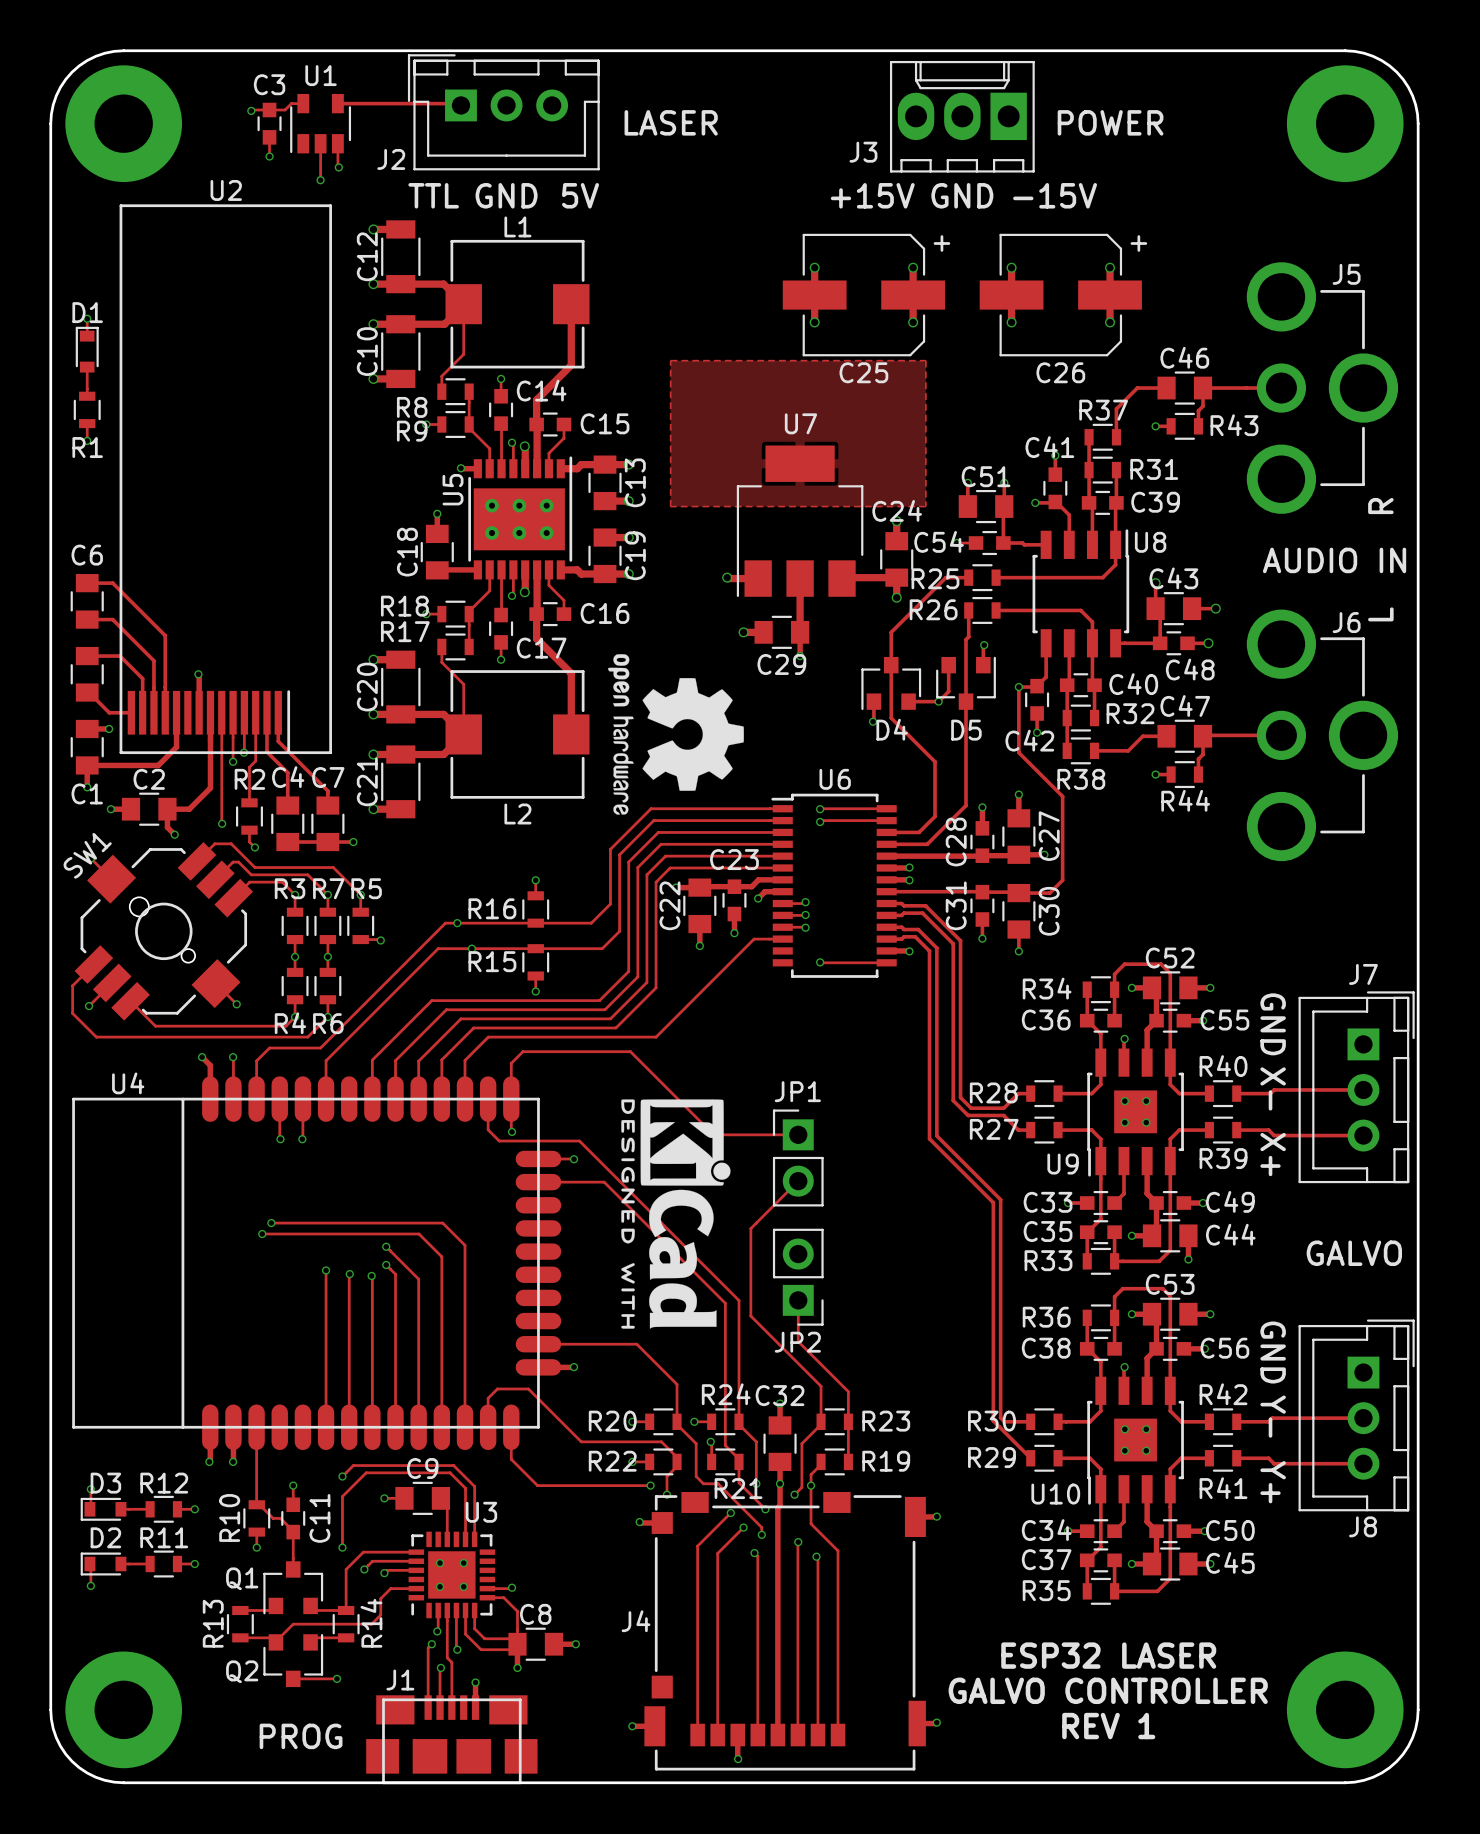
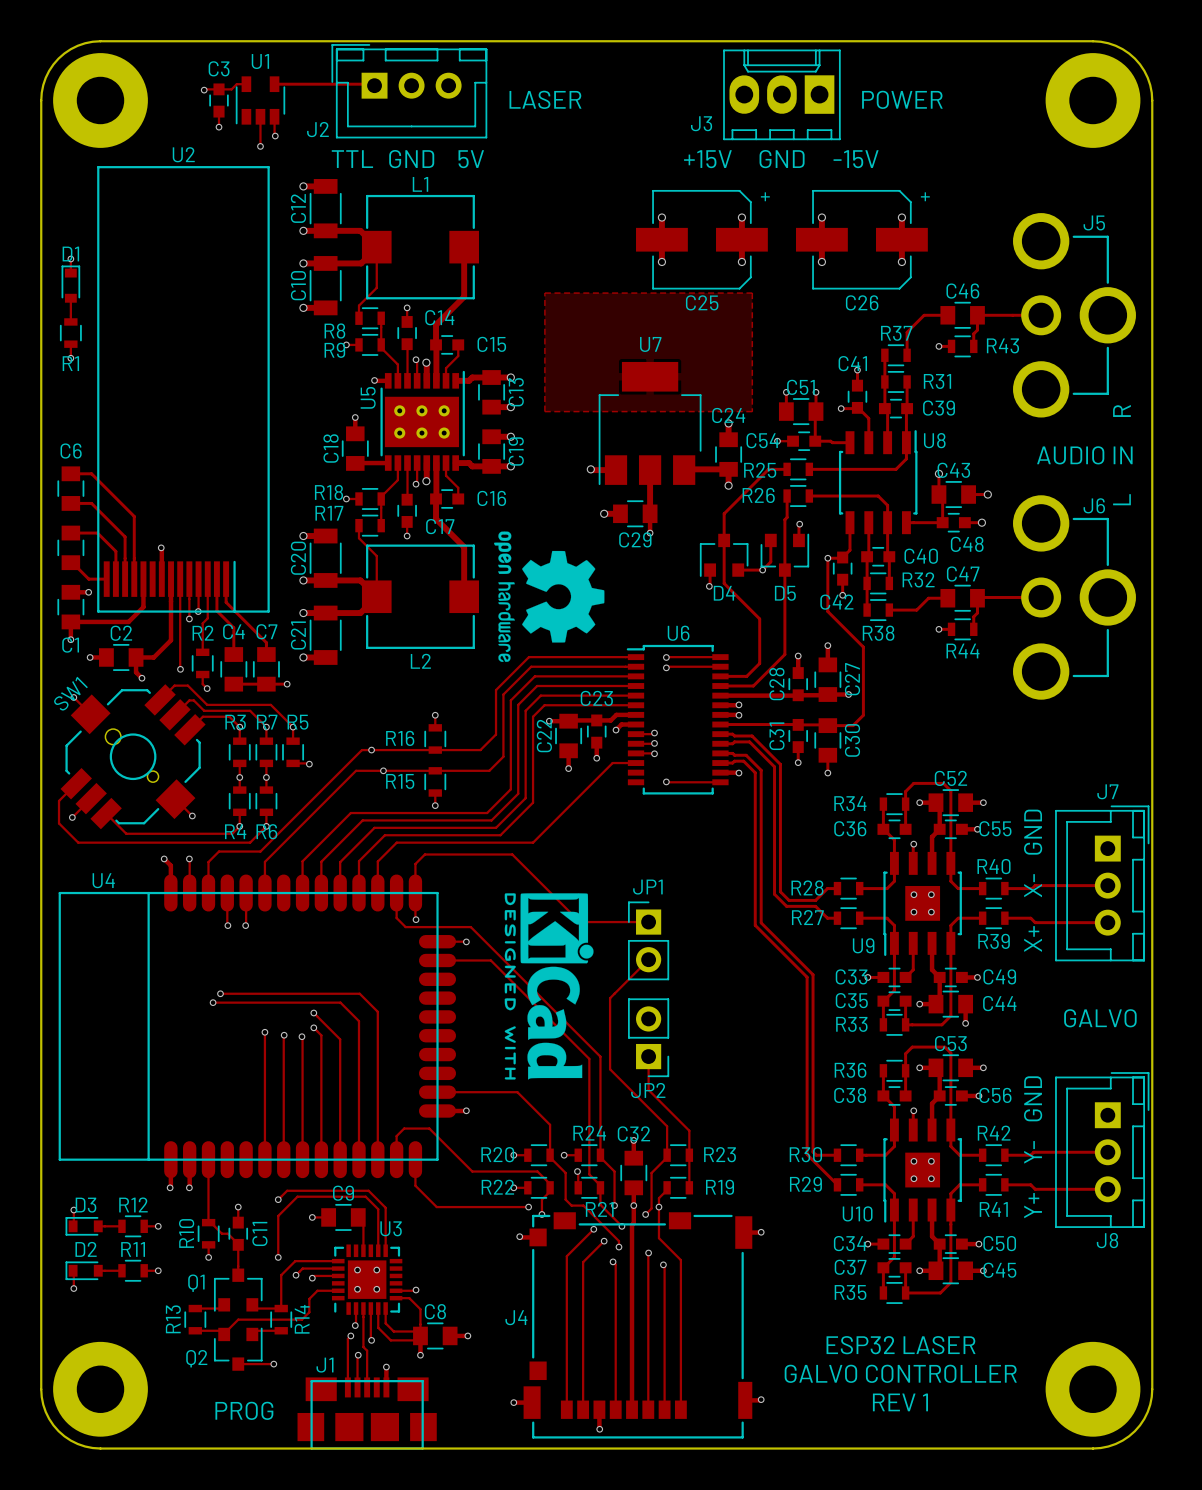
text rotation: 0° (1273, 1024) -> 180° (1033, 832)
text rotation: 0° (1273, 1088) -> 180° (1033, 885)
text rotation: 0° (1273, 1154) -> 180° (1033, 938)
text rotation: 0° (1273, 1352) -> 180° (1033, 1098)
text rotation: 0° (1273, 1416) -> 180° (1033, 1152)
text rotation: 0° (1273, 1482) -> 180° (1033, 1205)

